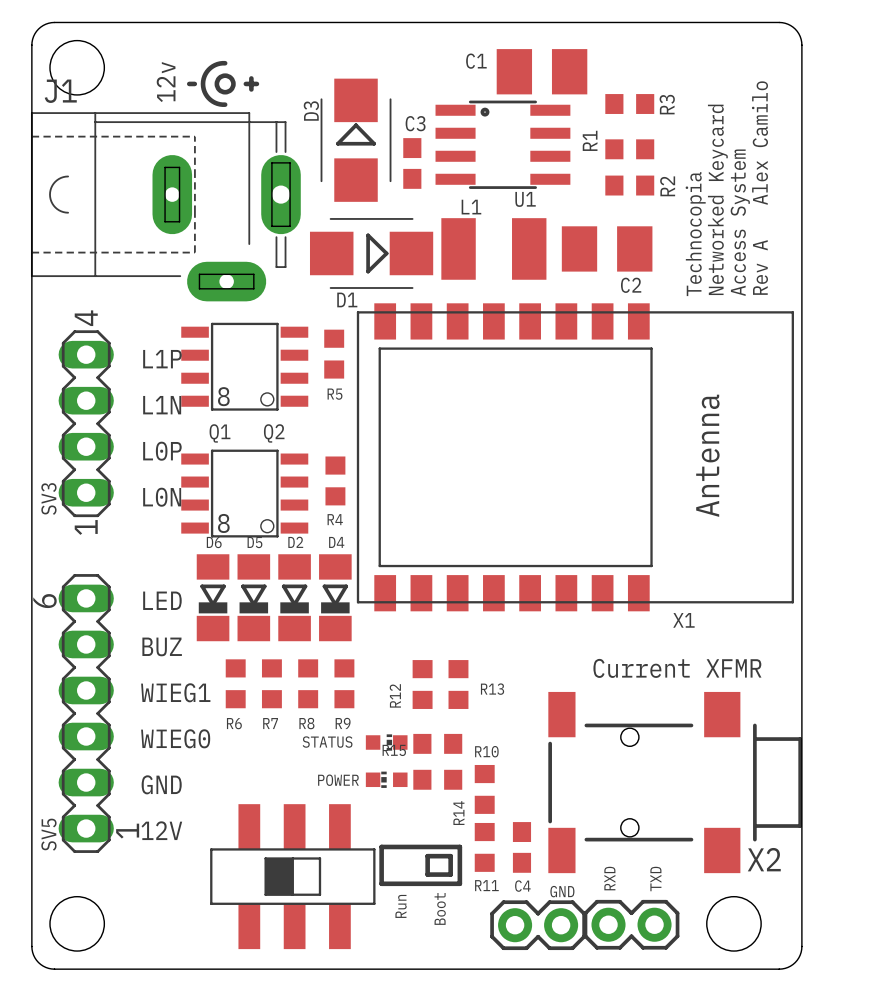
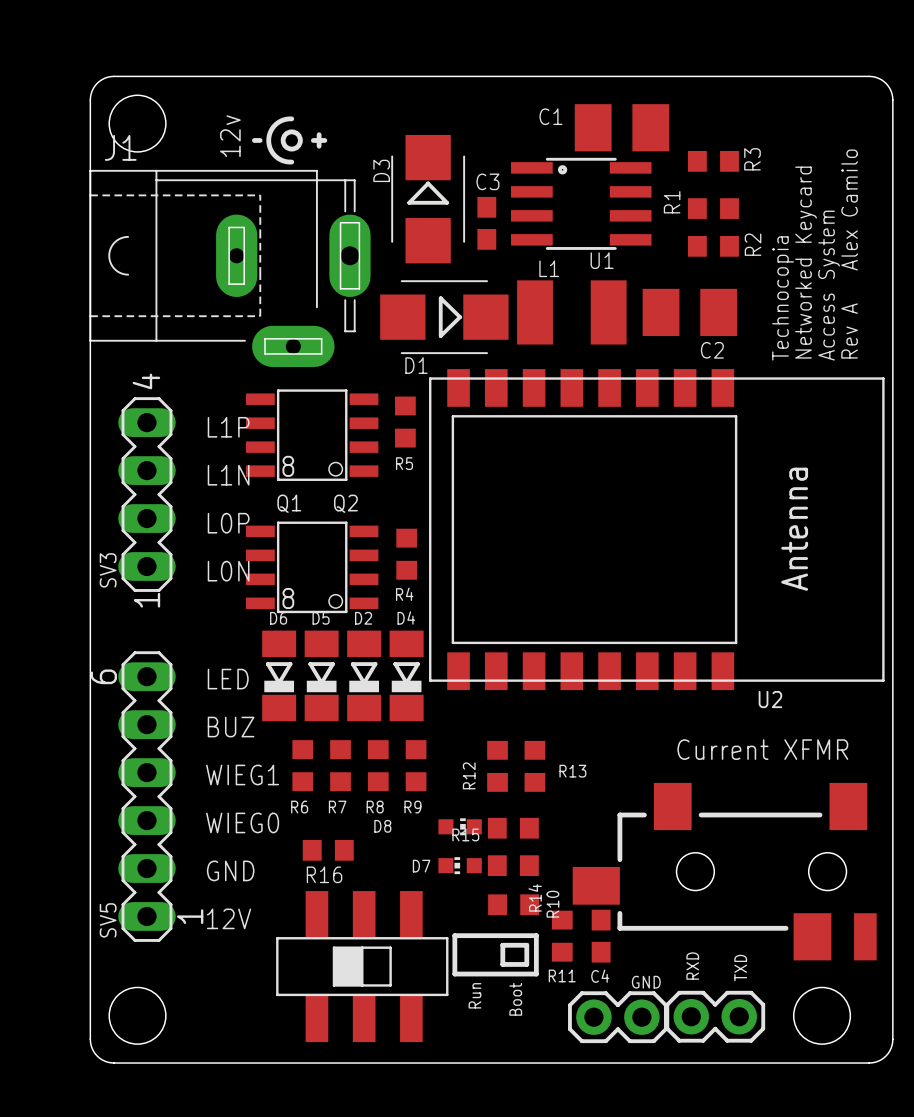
X1 name: X1 (683, 620) -> U2 (770, 699)
STATUS name: STATUS (327, 742) -> D8 (382, 826)
R16: none -> (328, 850)
POWER name: POWER (338, 780) -> D7 (421, 866)
X2: (675, 782) -> none
part: none -> (724, 871)
R10 rotation: 0° (484, 789) -> 90° clockwise (513, 904)
R10 position: (484, 789) -> (513, 904)

